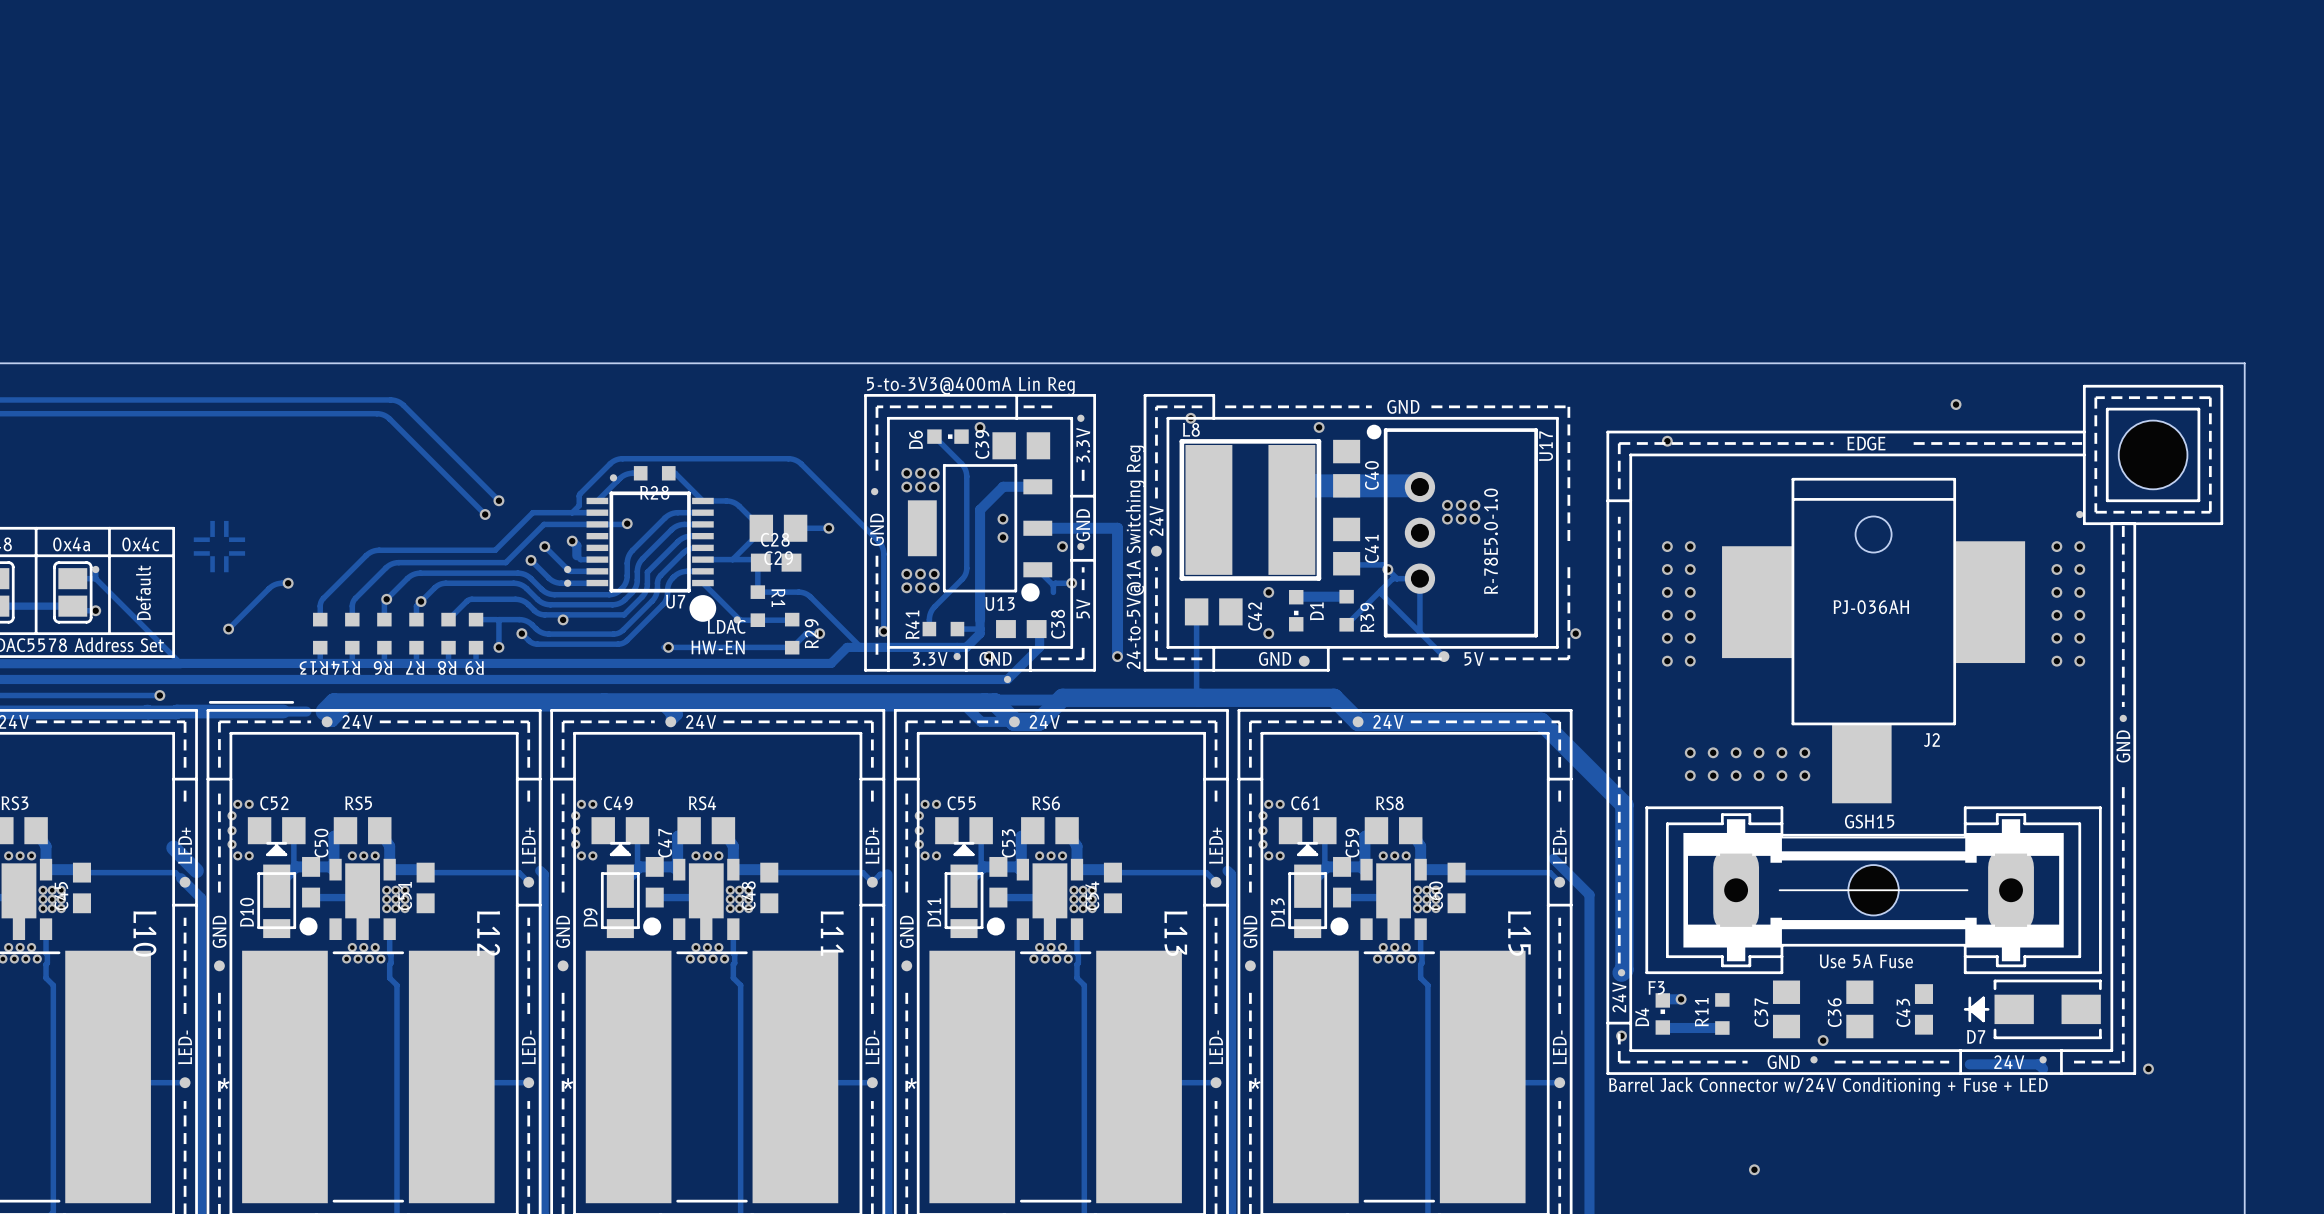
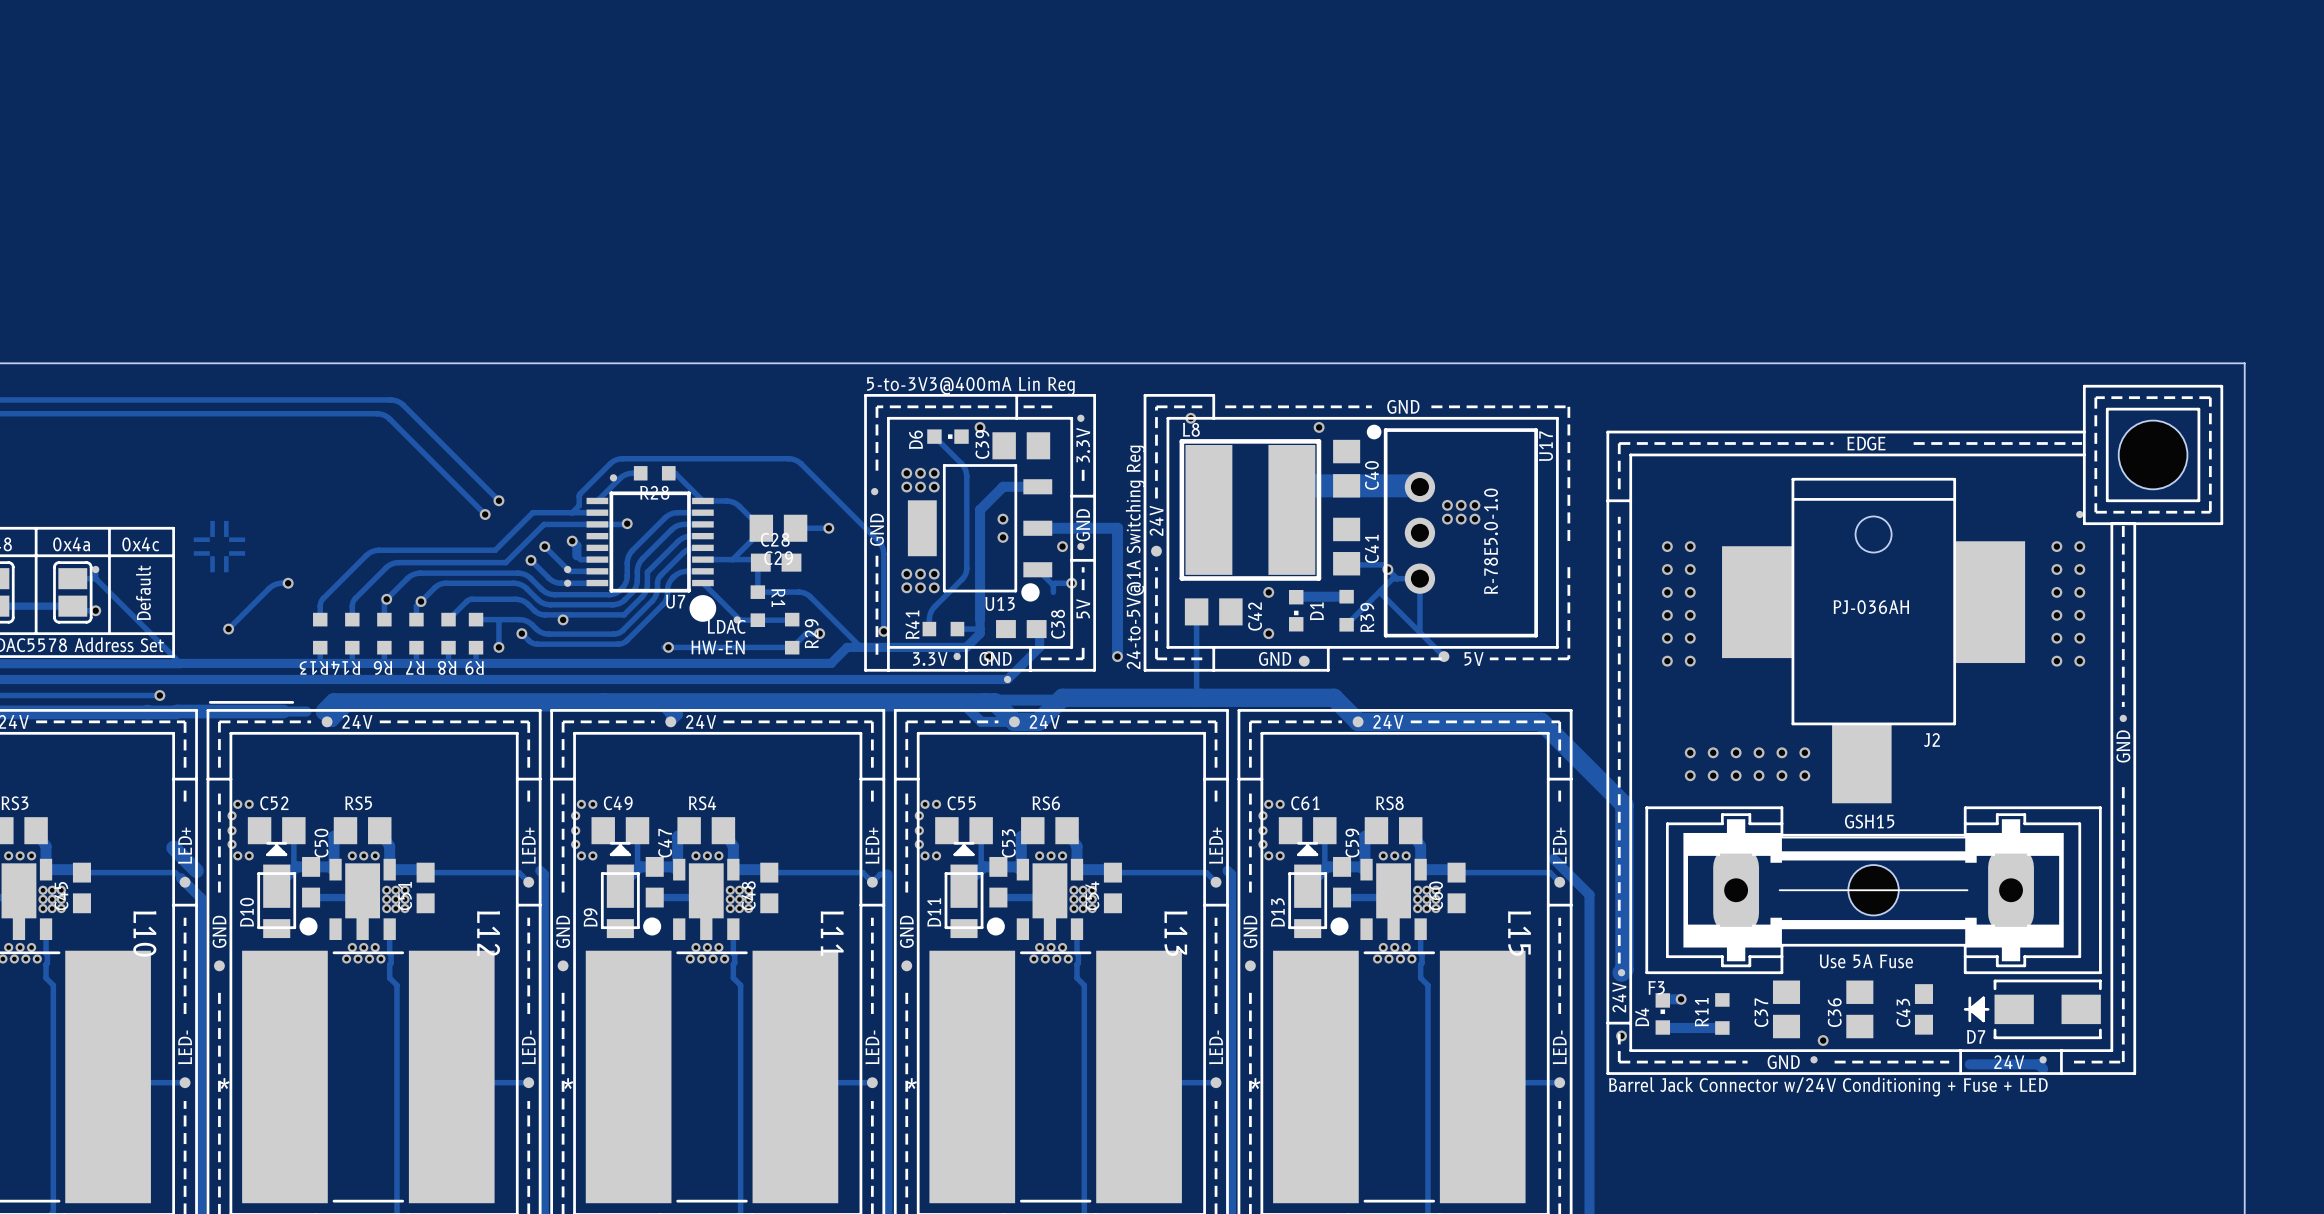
via: (1956, 404) -> none
via: (1667, 441) -> none
via: (1575, 633) -> none
via: (2148, 1068) -> none
via: (1754, 1169) -> none

